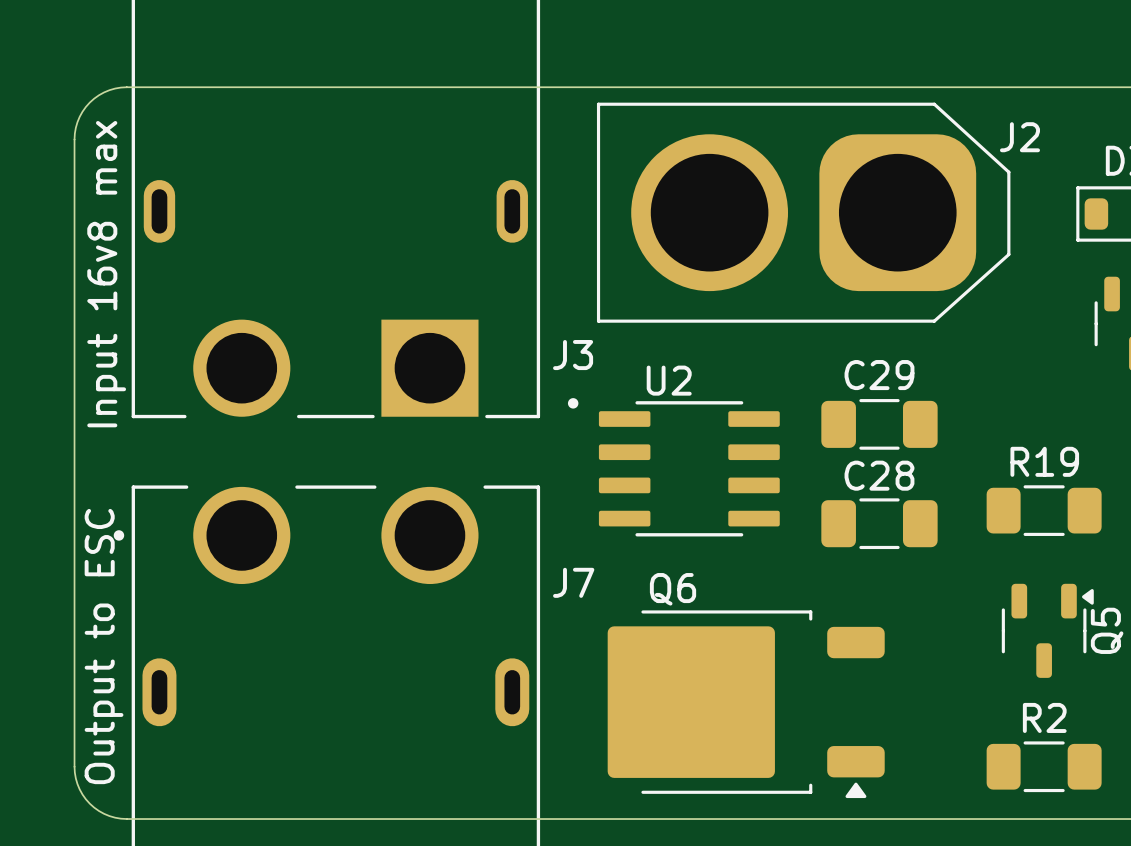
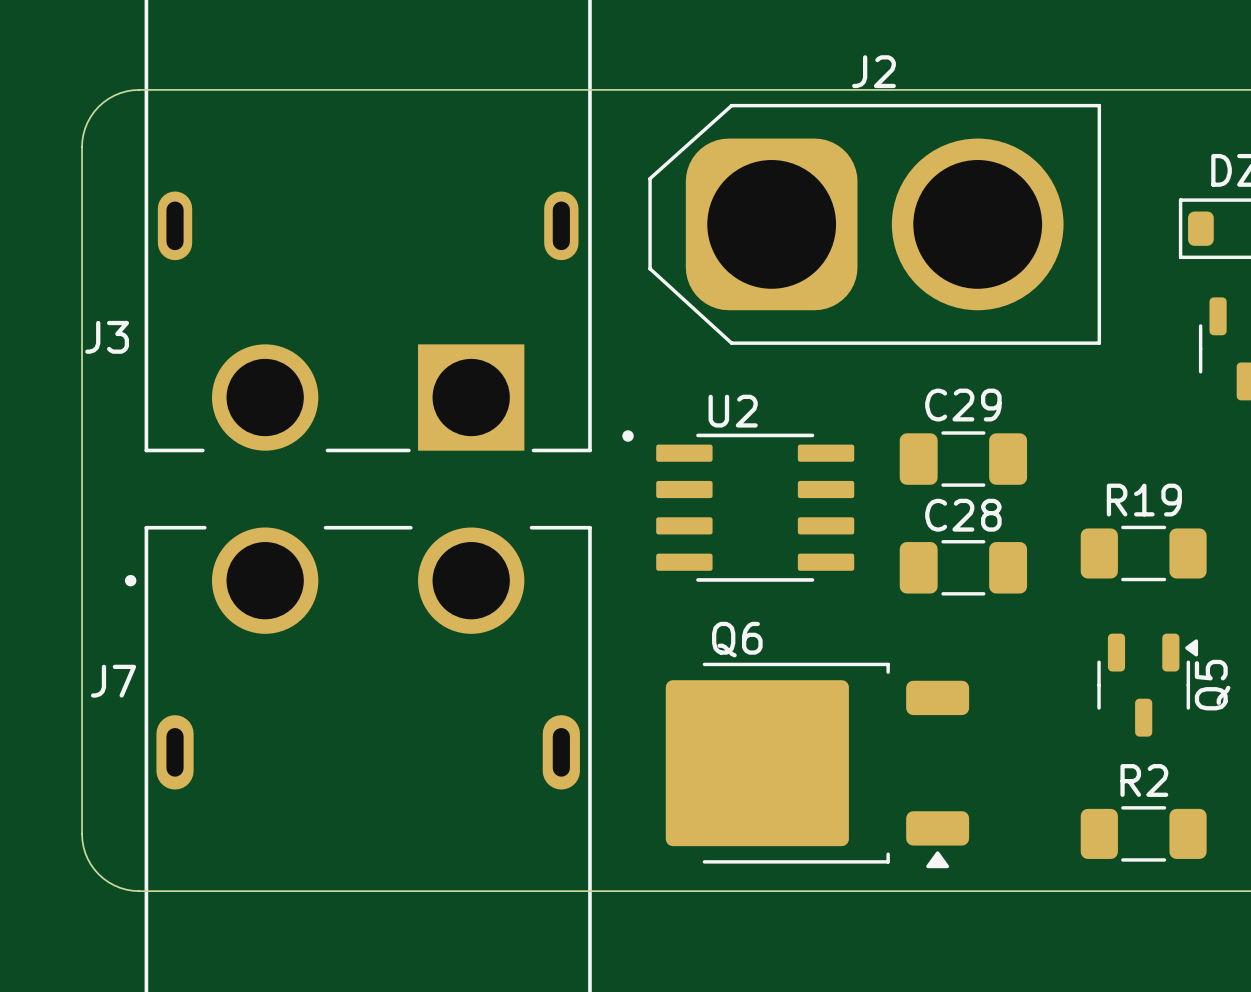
J2 name position: J2 (1019, 137) -> J2 (874, 71)
J2 rotation: 0° (803, 212) -> 180° (874, 224)
text: Input 16v8 max (106, 274) -> none
J3 name position: J3 (573, 355) -> J3 (107, 337)
J7 name position: J7 (573, 582) -> J7 (113, 681)
text: Output to ESC (104, 646) -> none

